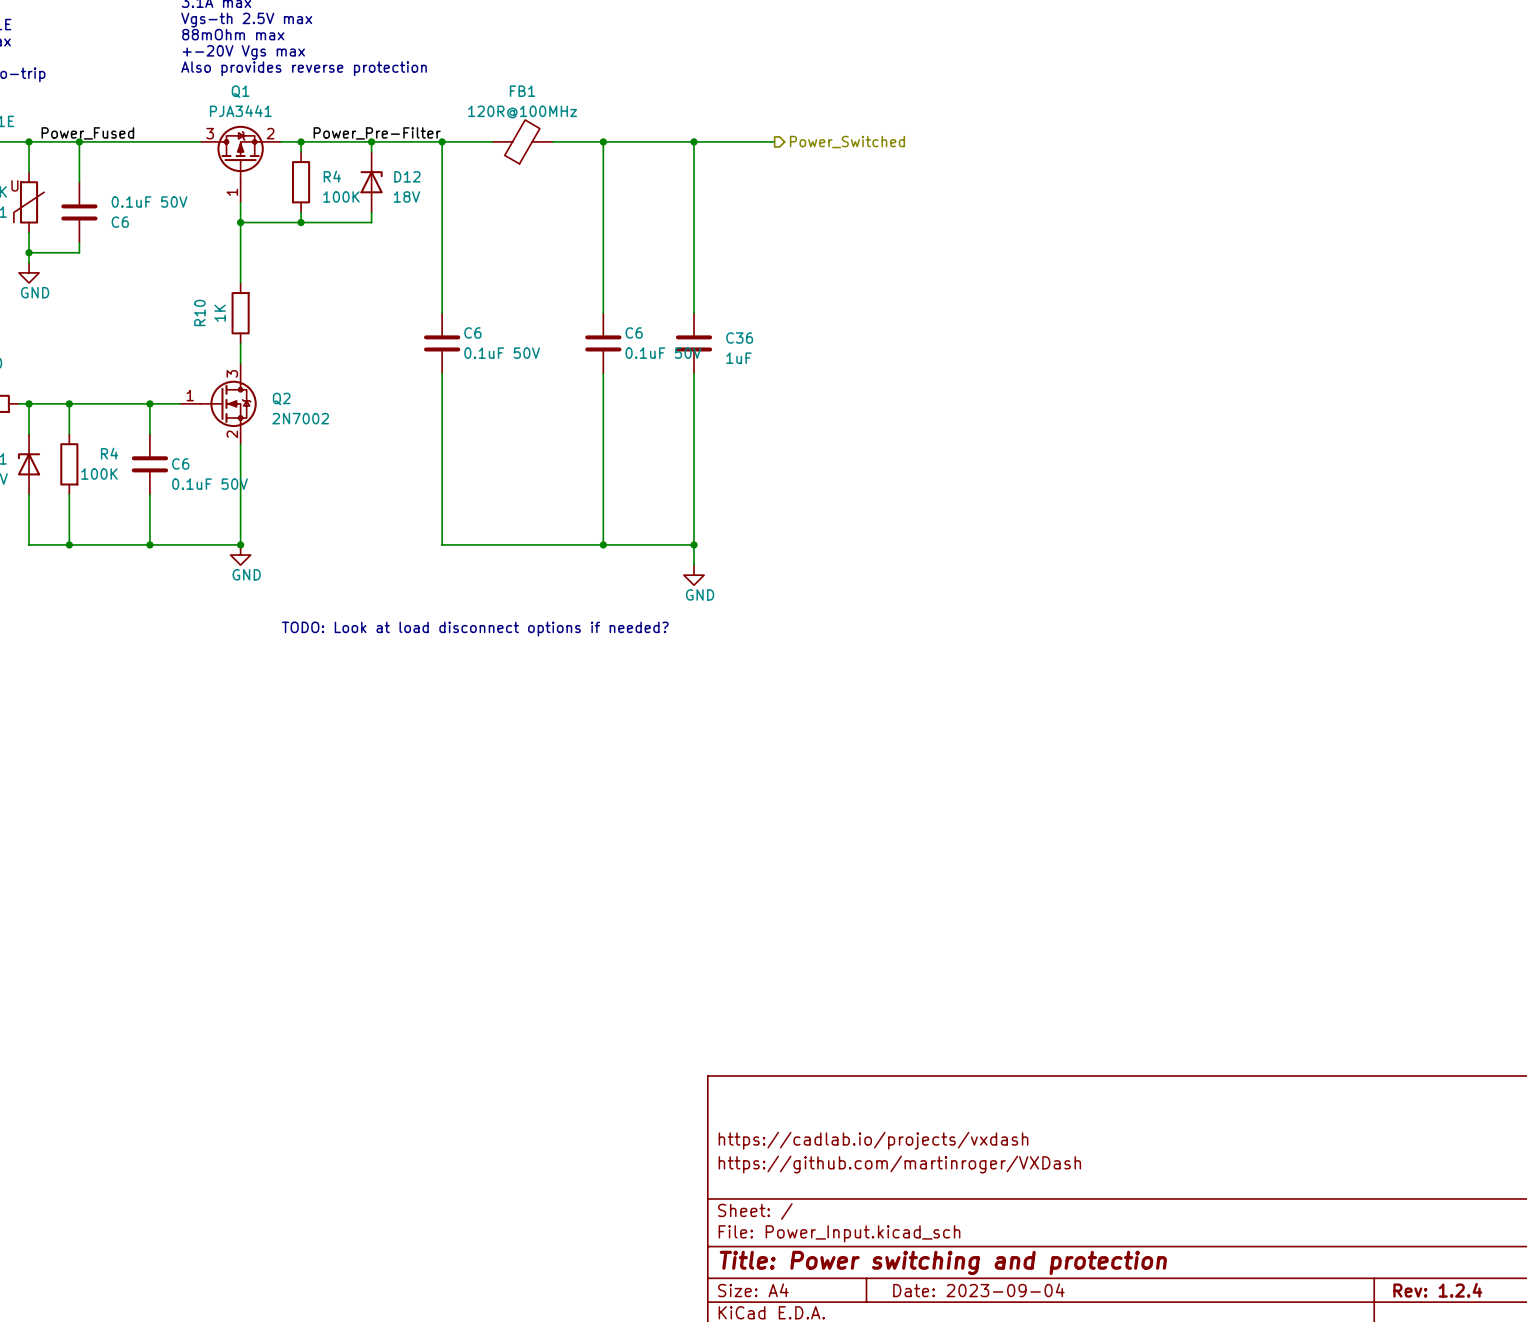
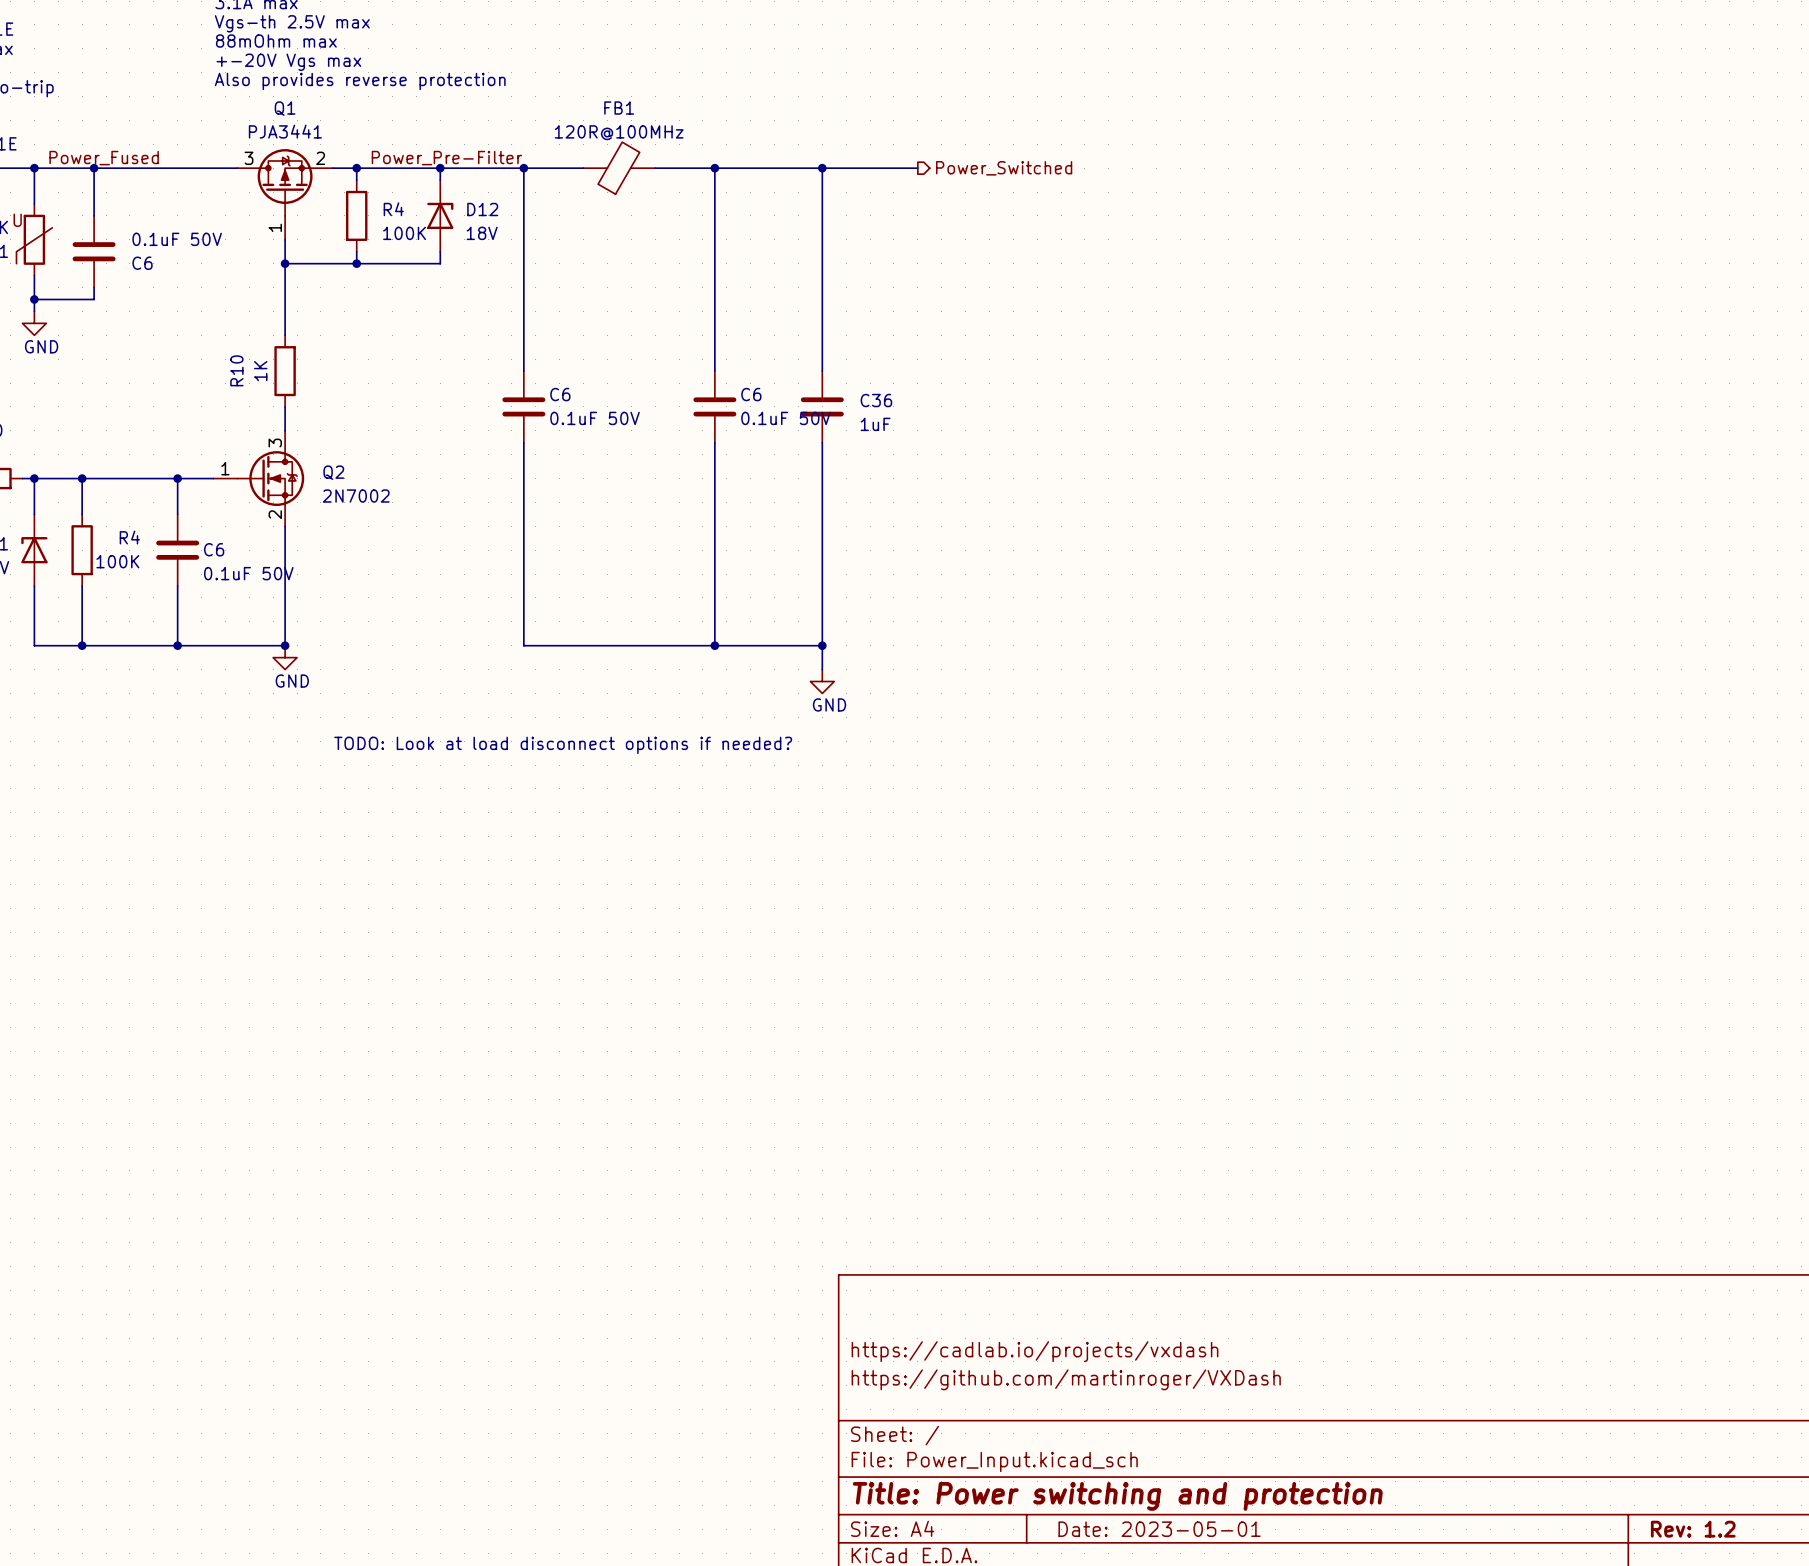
title block: Date: 2023-09-04 (978, 1290) -> Date: 2023-05-01 (1159, 1529)
title block: Rev: 1.2.4 (1437, 1290) -> Rev: 1.2 (1693, 1529)

